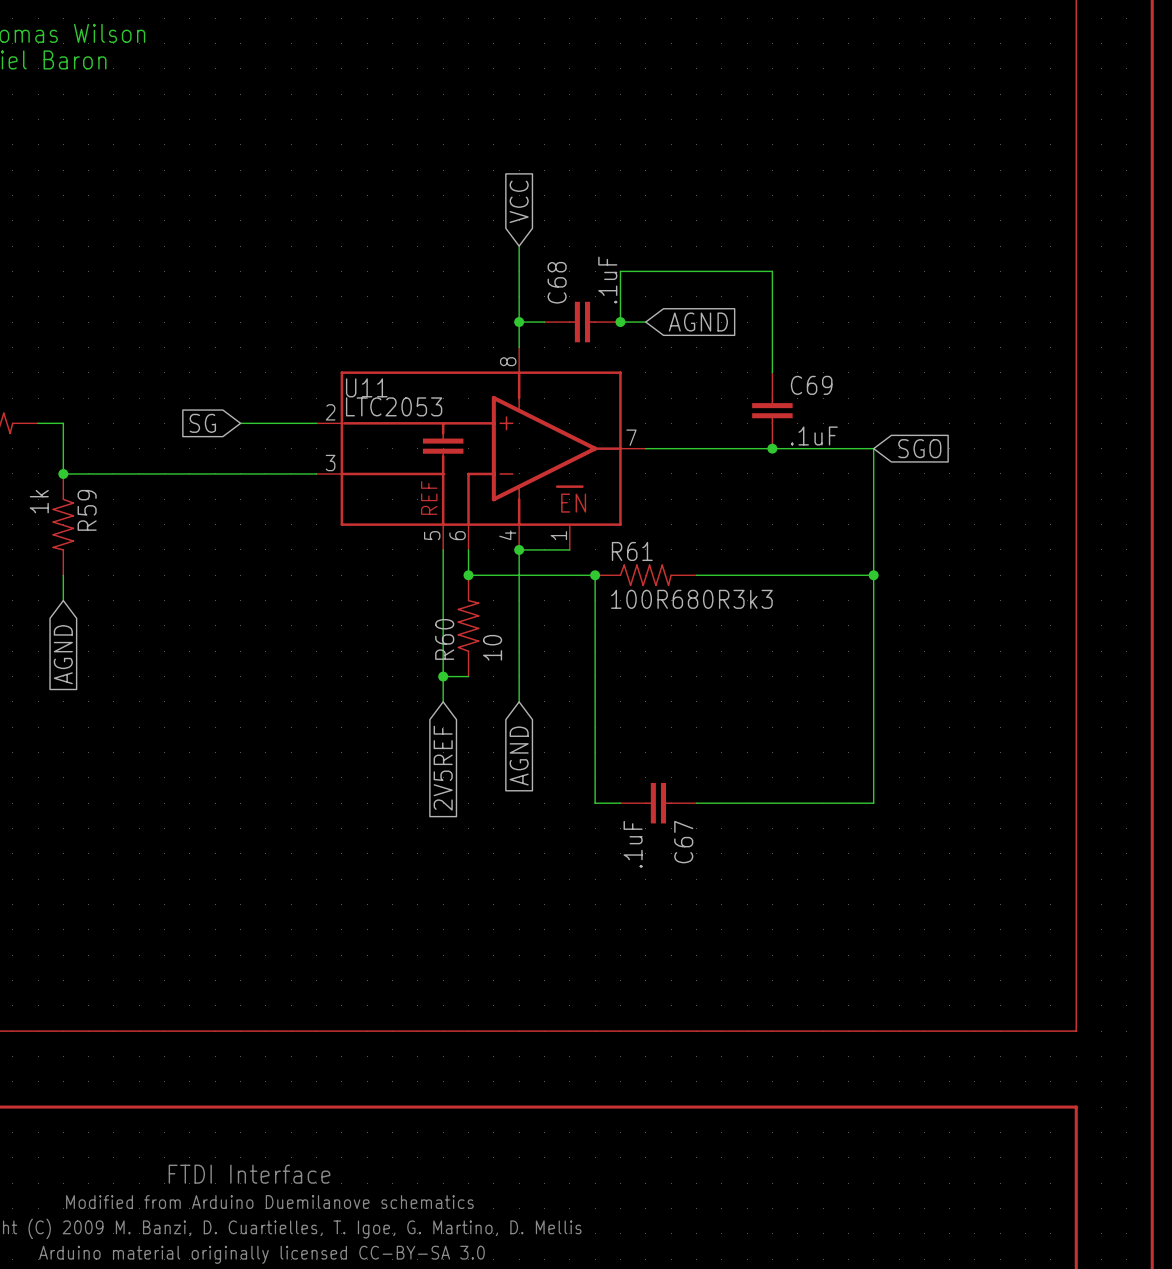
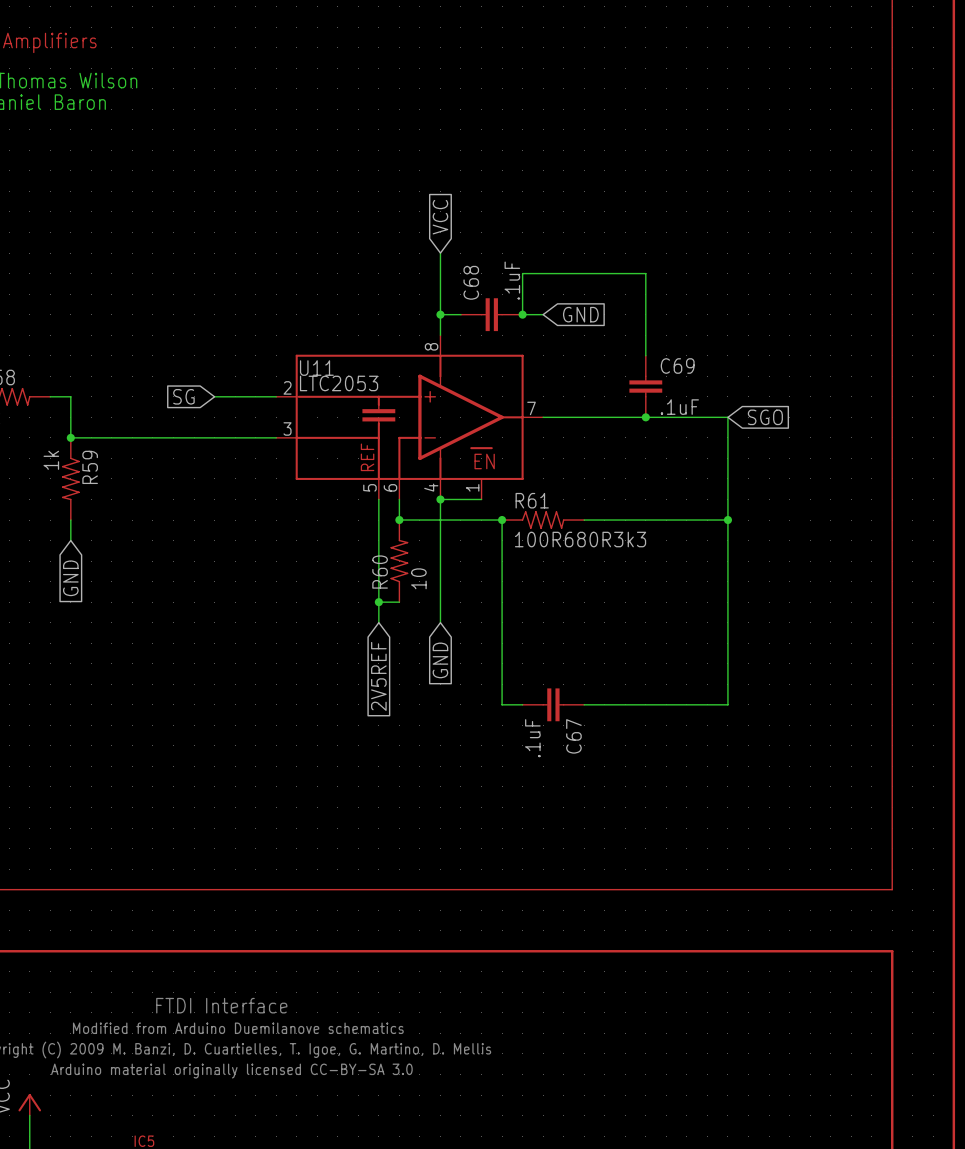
global label: AGND (698, 322) -> GND (580, 314)
global label: AGND (63, 654) -> GND (70, 578)
global label: AGND (519, 756) -> GND (440, 660)

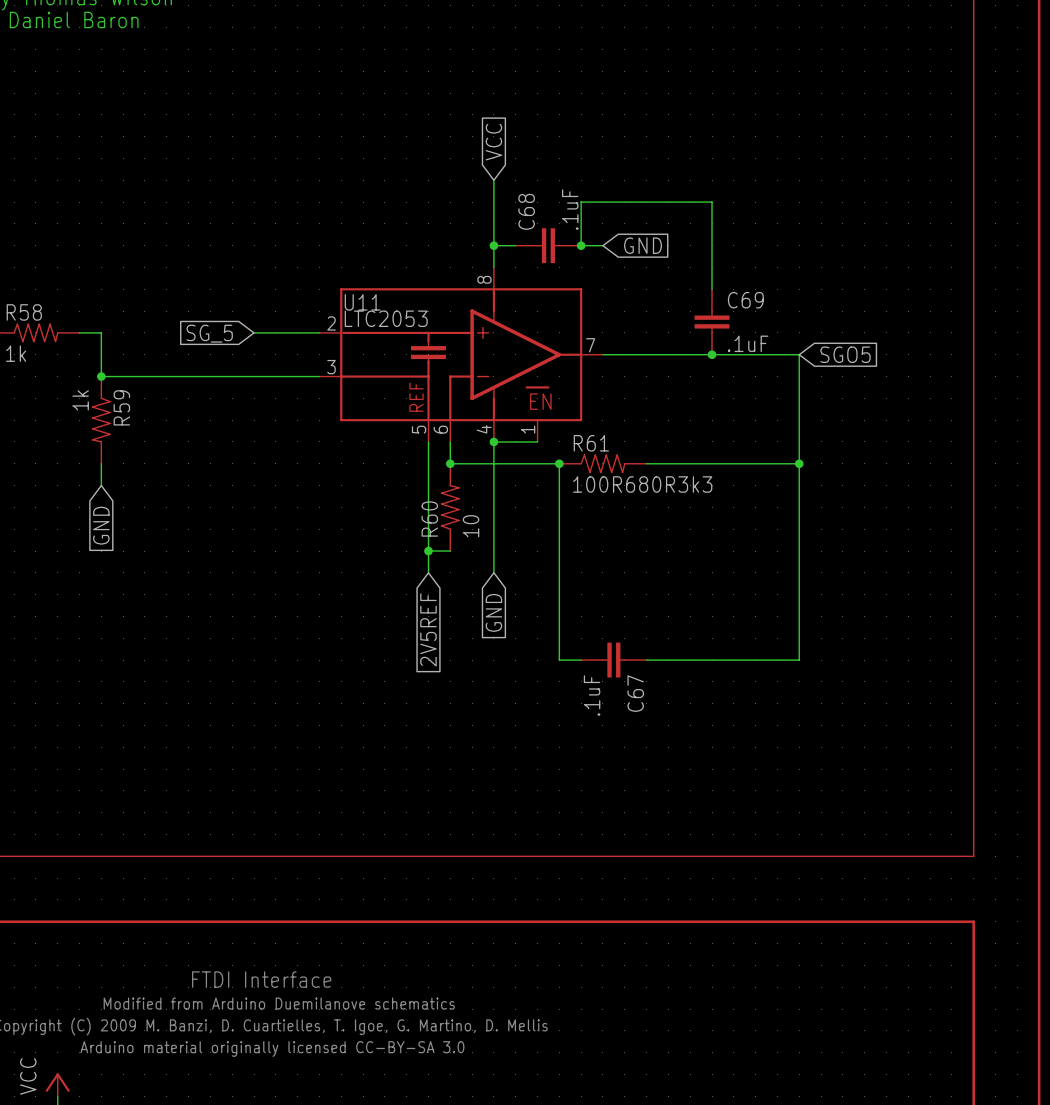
global label: SG (183, 396) -> SG_5 (209, 333)
global label: SGO (765, 417) -> SGO5 (845, 354)

